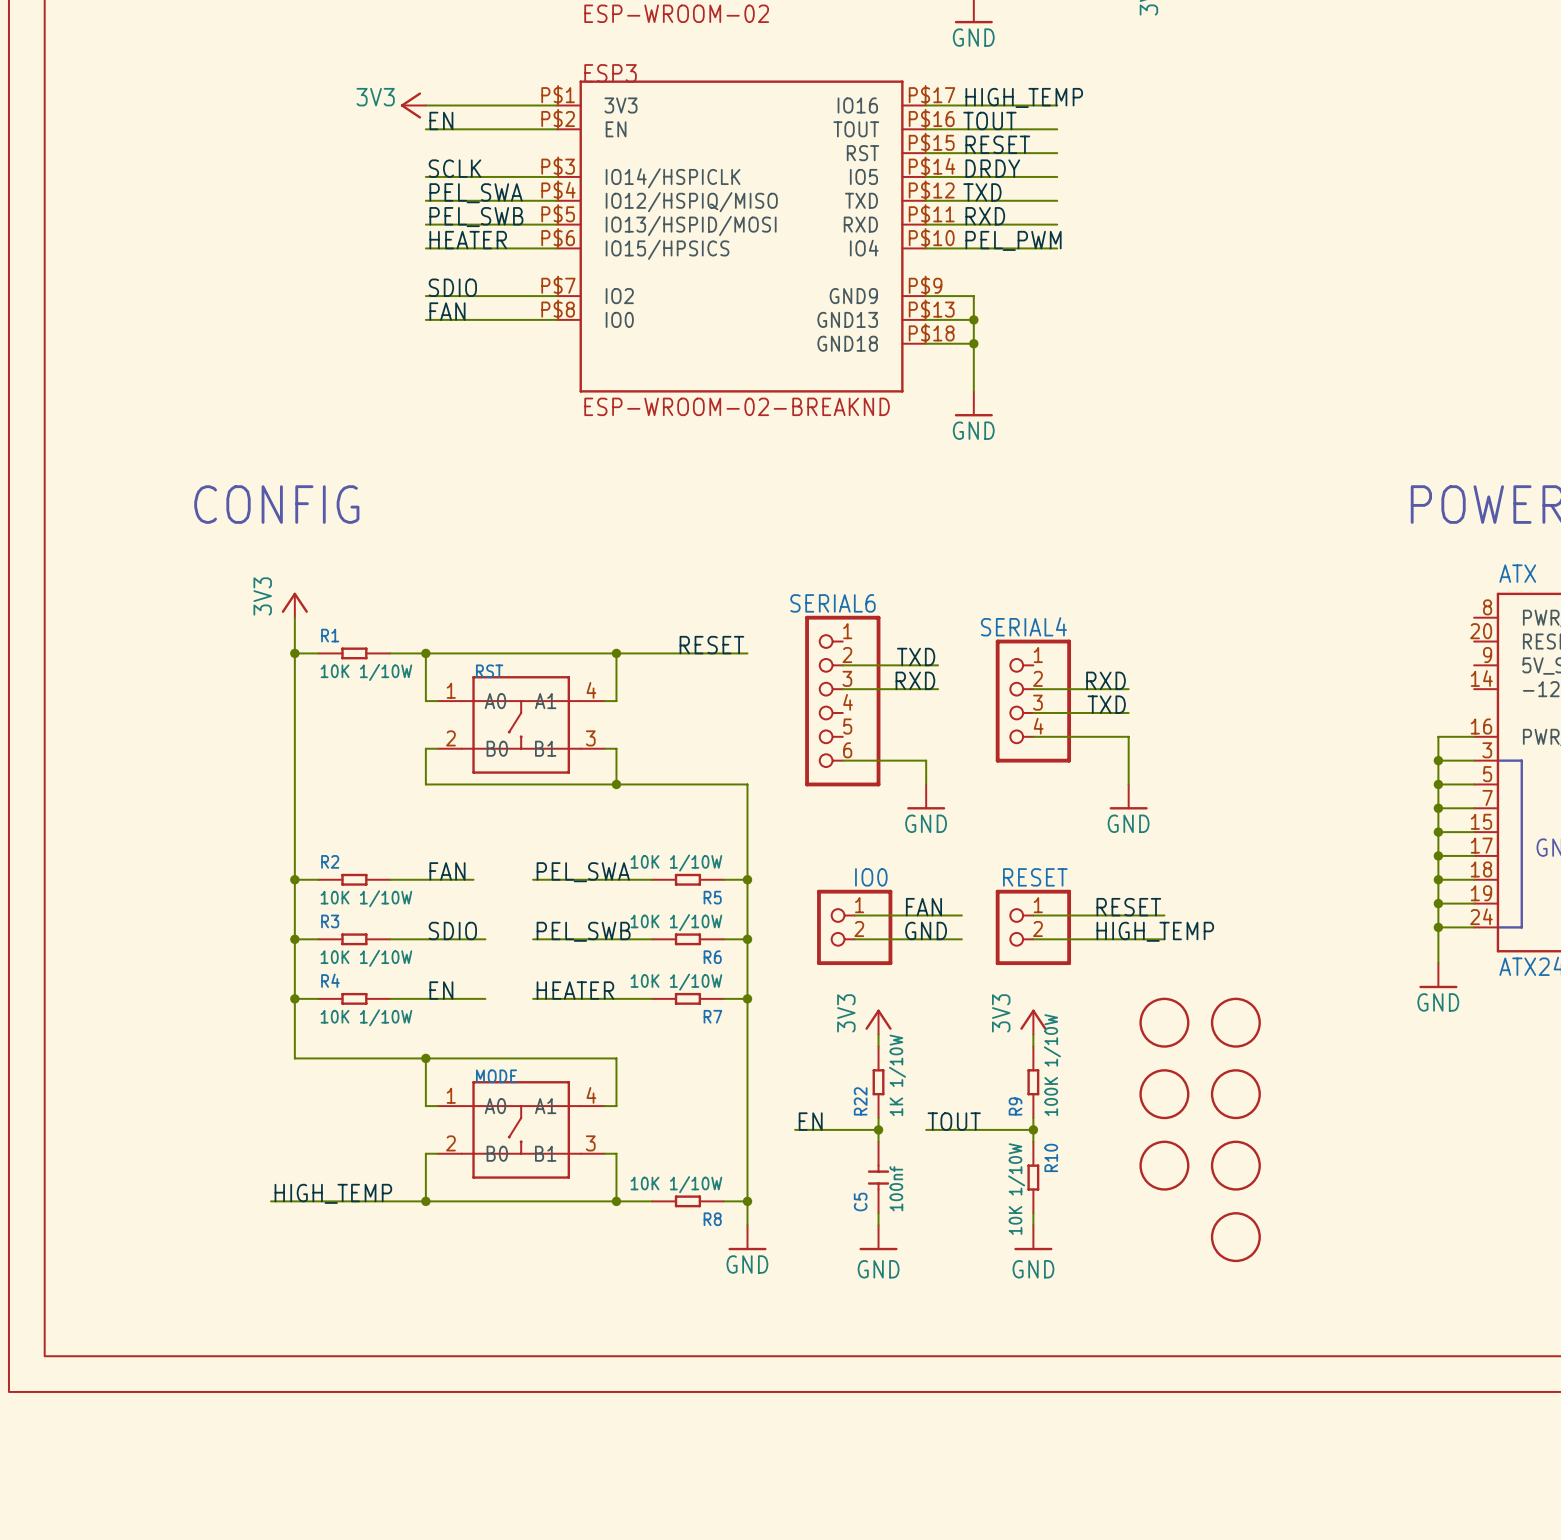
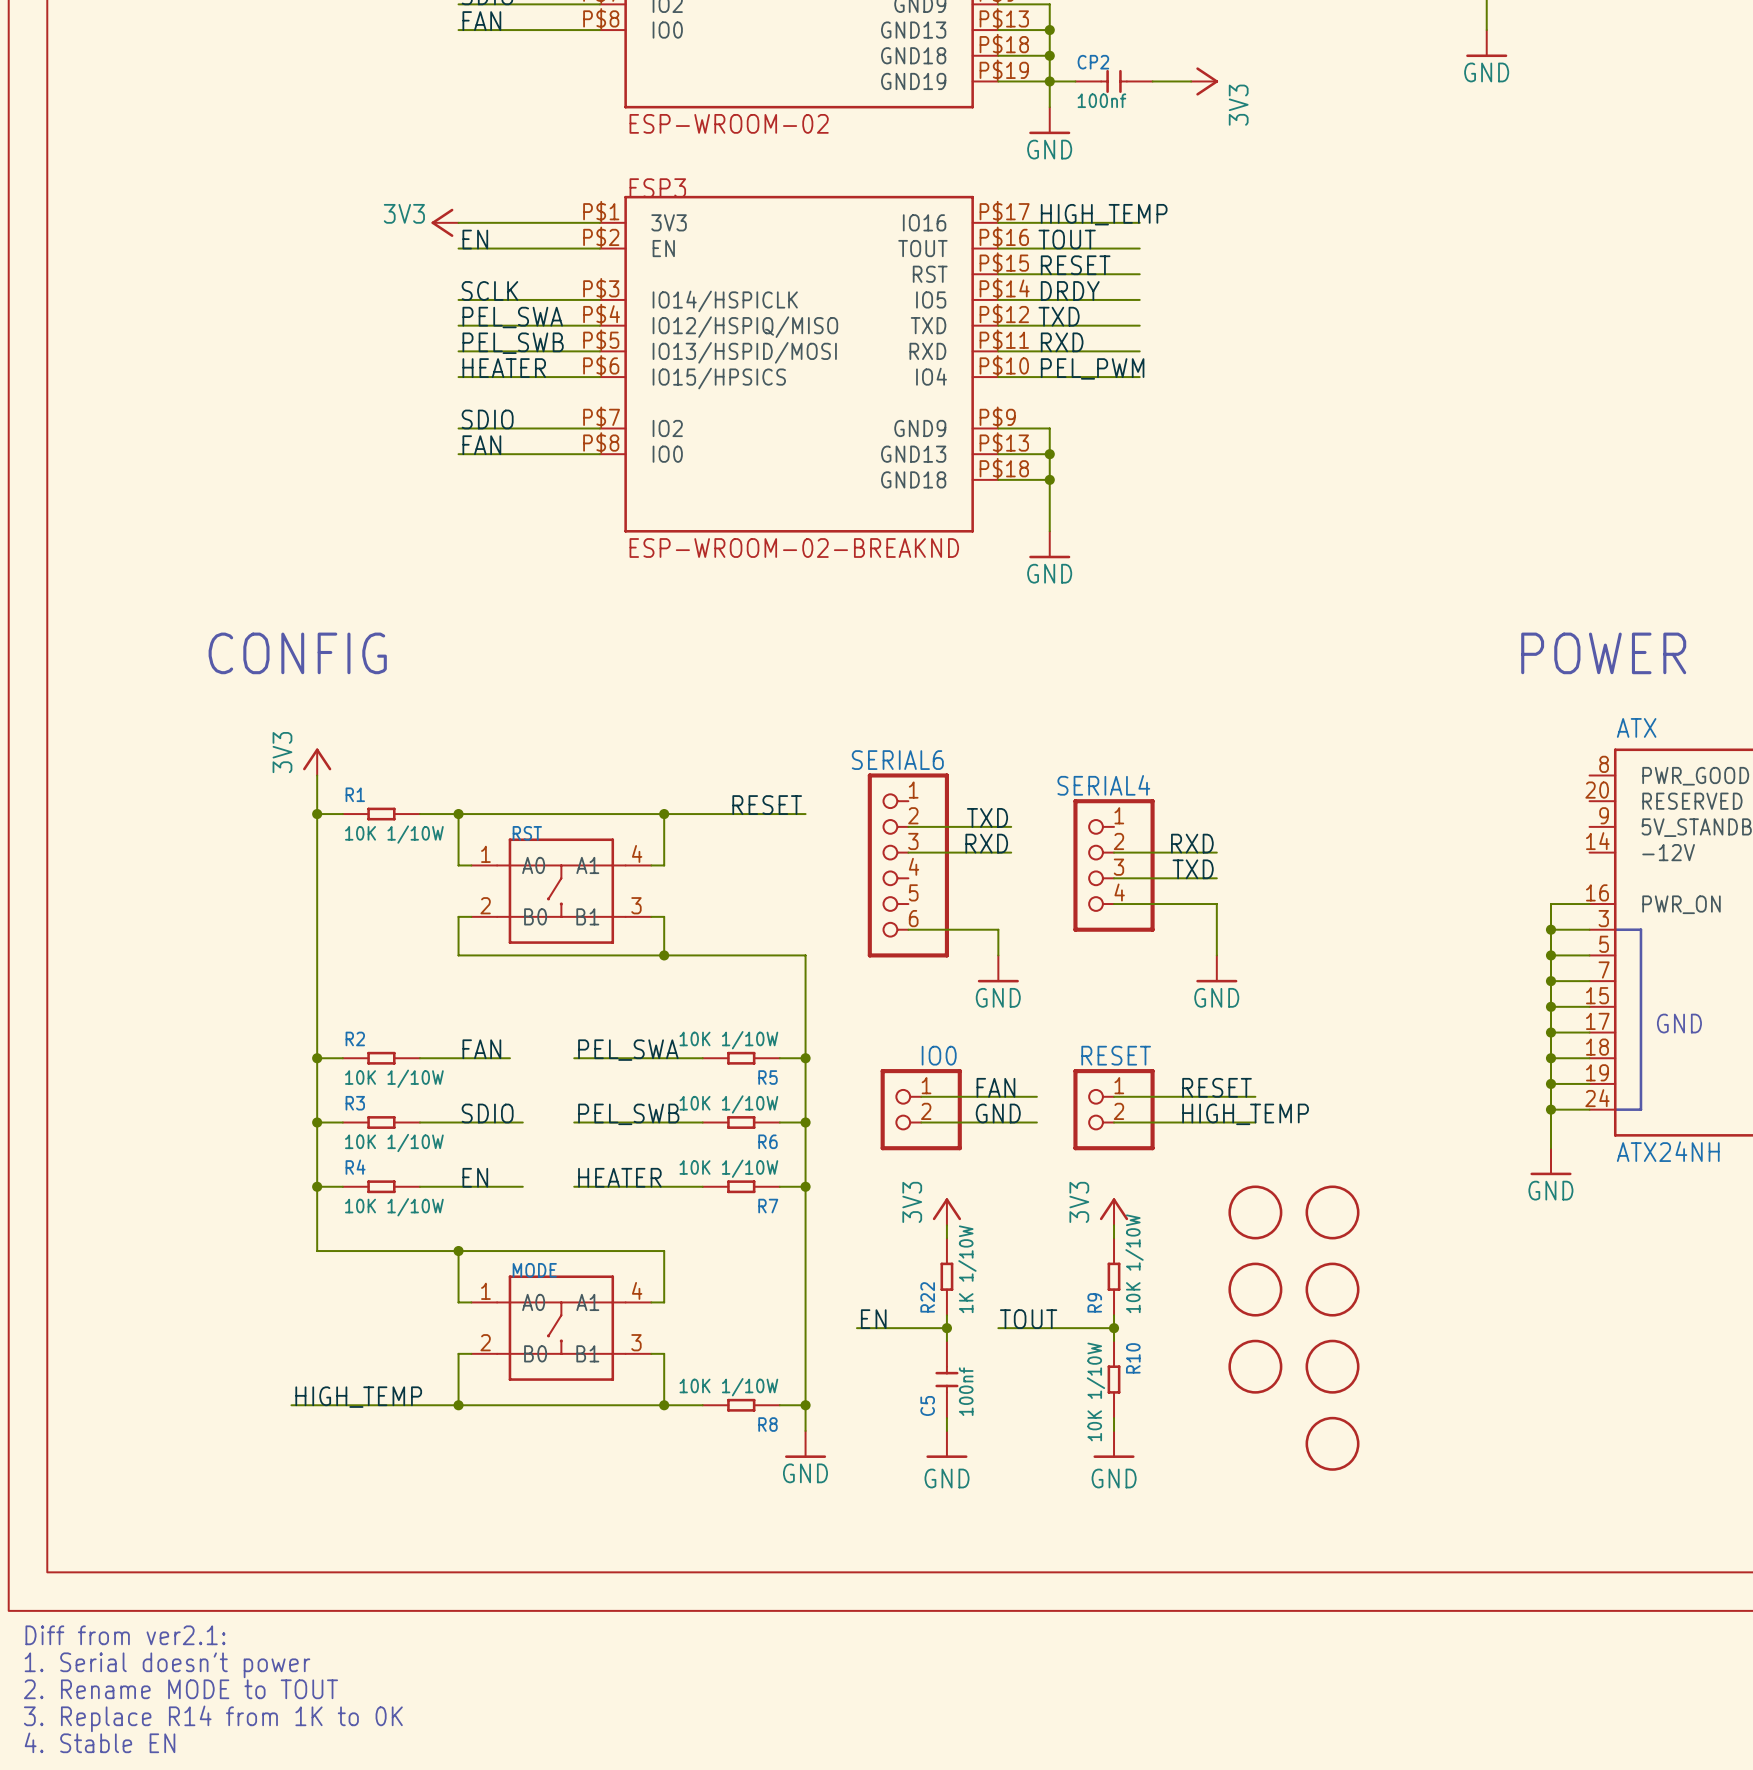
R9 value: 100K 1/10W (1052, 1065) -> 10K 1/10W (1134, 1263)
text: none -> Diff from ver2.1: (125, 1635)
text: none -> 1. Serial doesn't power (167, 1665)
text: none -> 2. Rename MODE to TOUT (180, 1689)
text: none -> 3. Replace R14 from 1K to 0K (213, 1718)
text: none -> 4. Stable EN (100, 1742)

